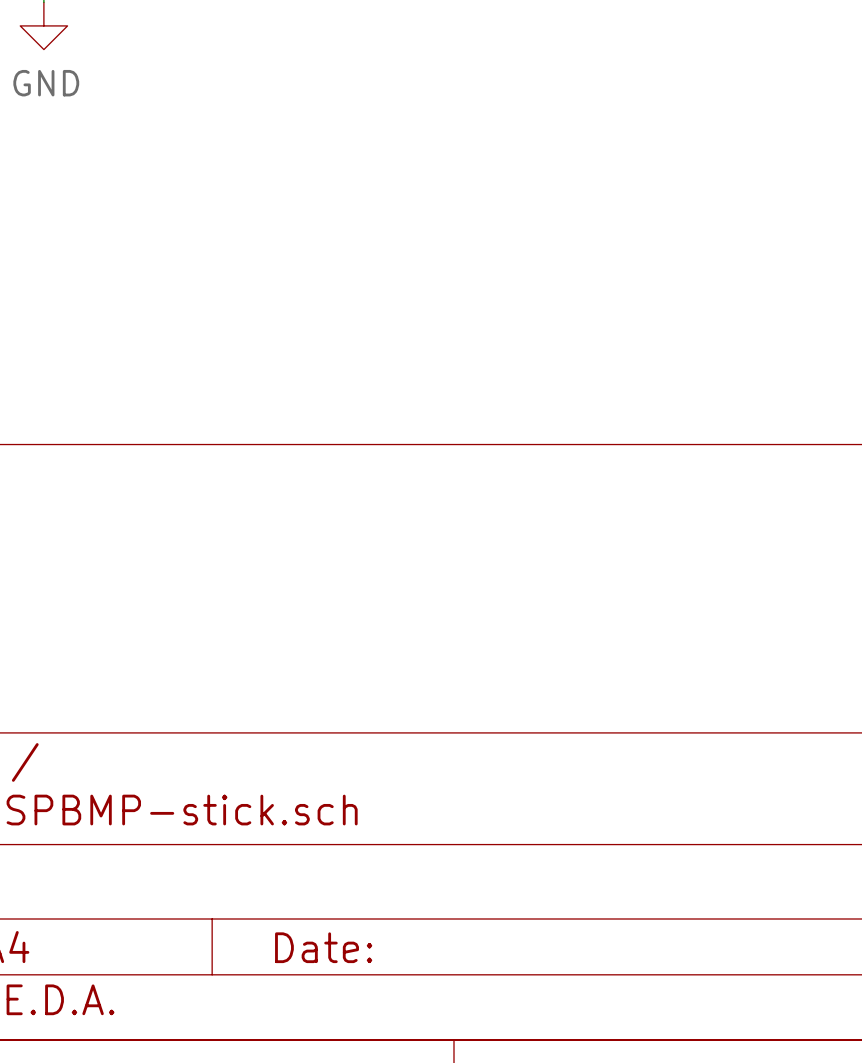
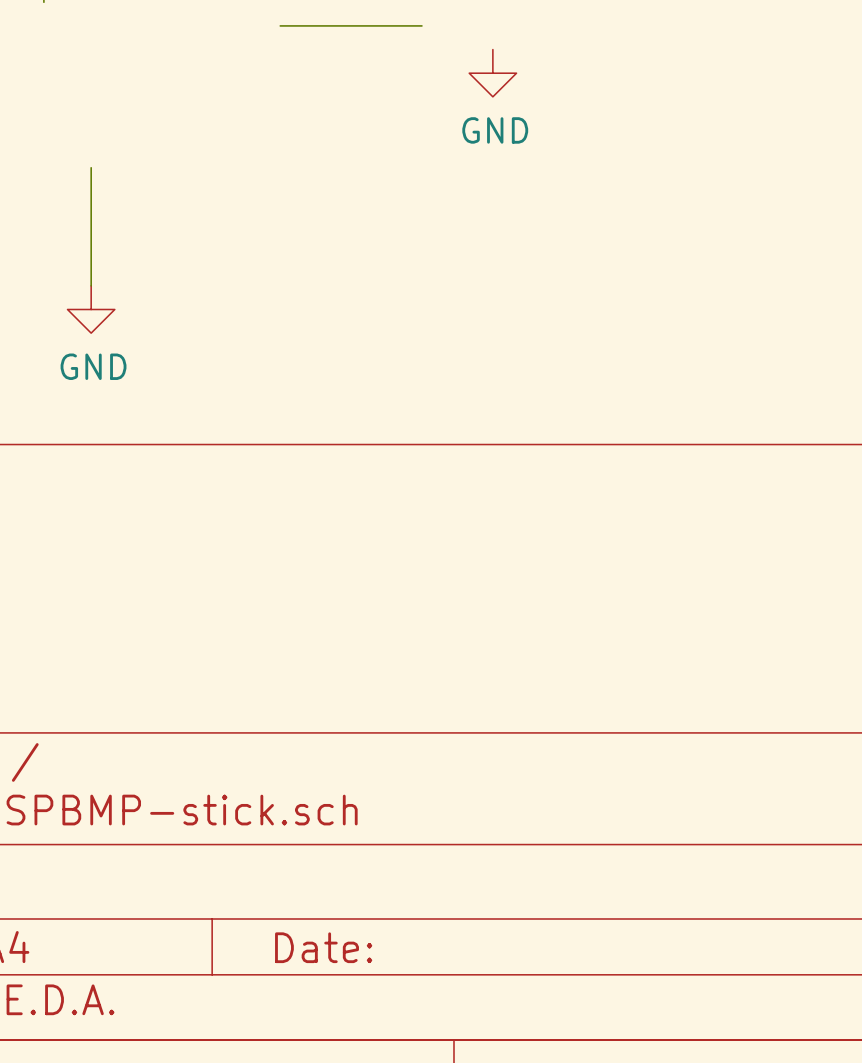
power symbol: GND (43, 25) -> none
wire: none -> (280, 25) (421, 25)
power symbol: none -> GND (492, 73)
wire: none -> (91, 167) (91, 285)
power symbol: none -> GND (91, 309)

